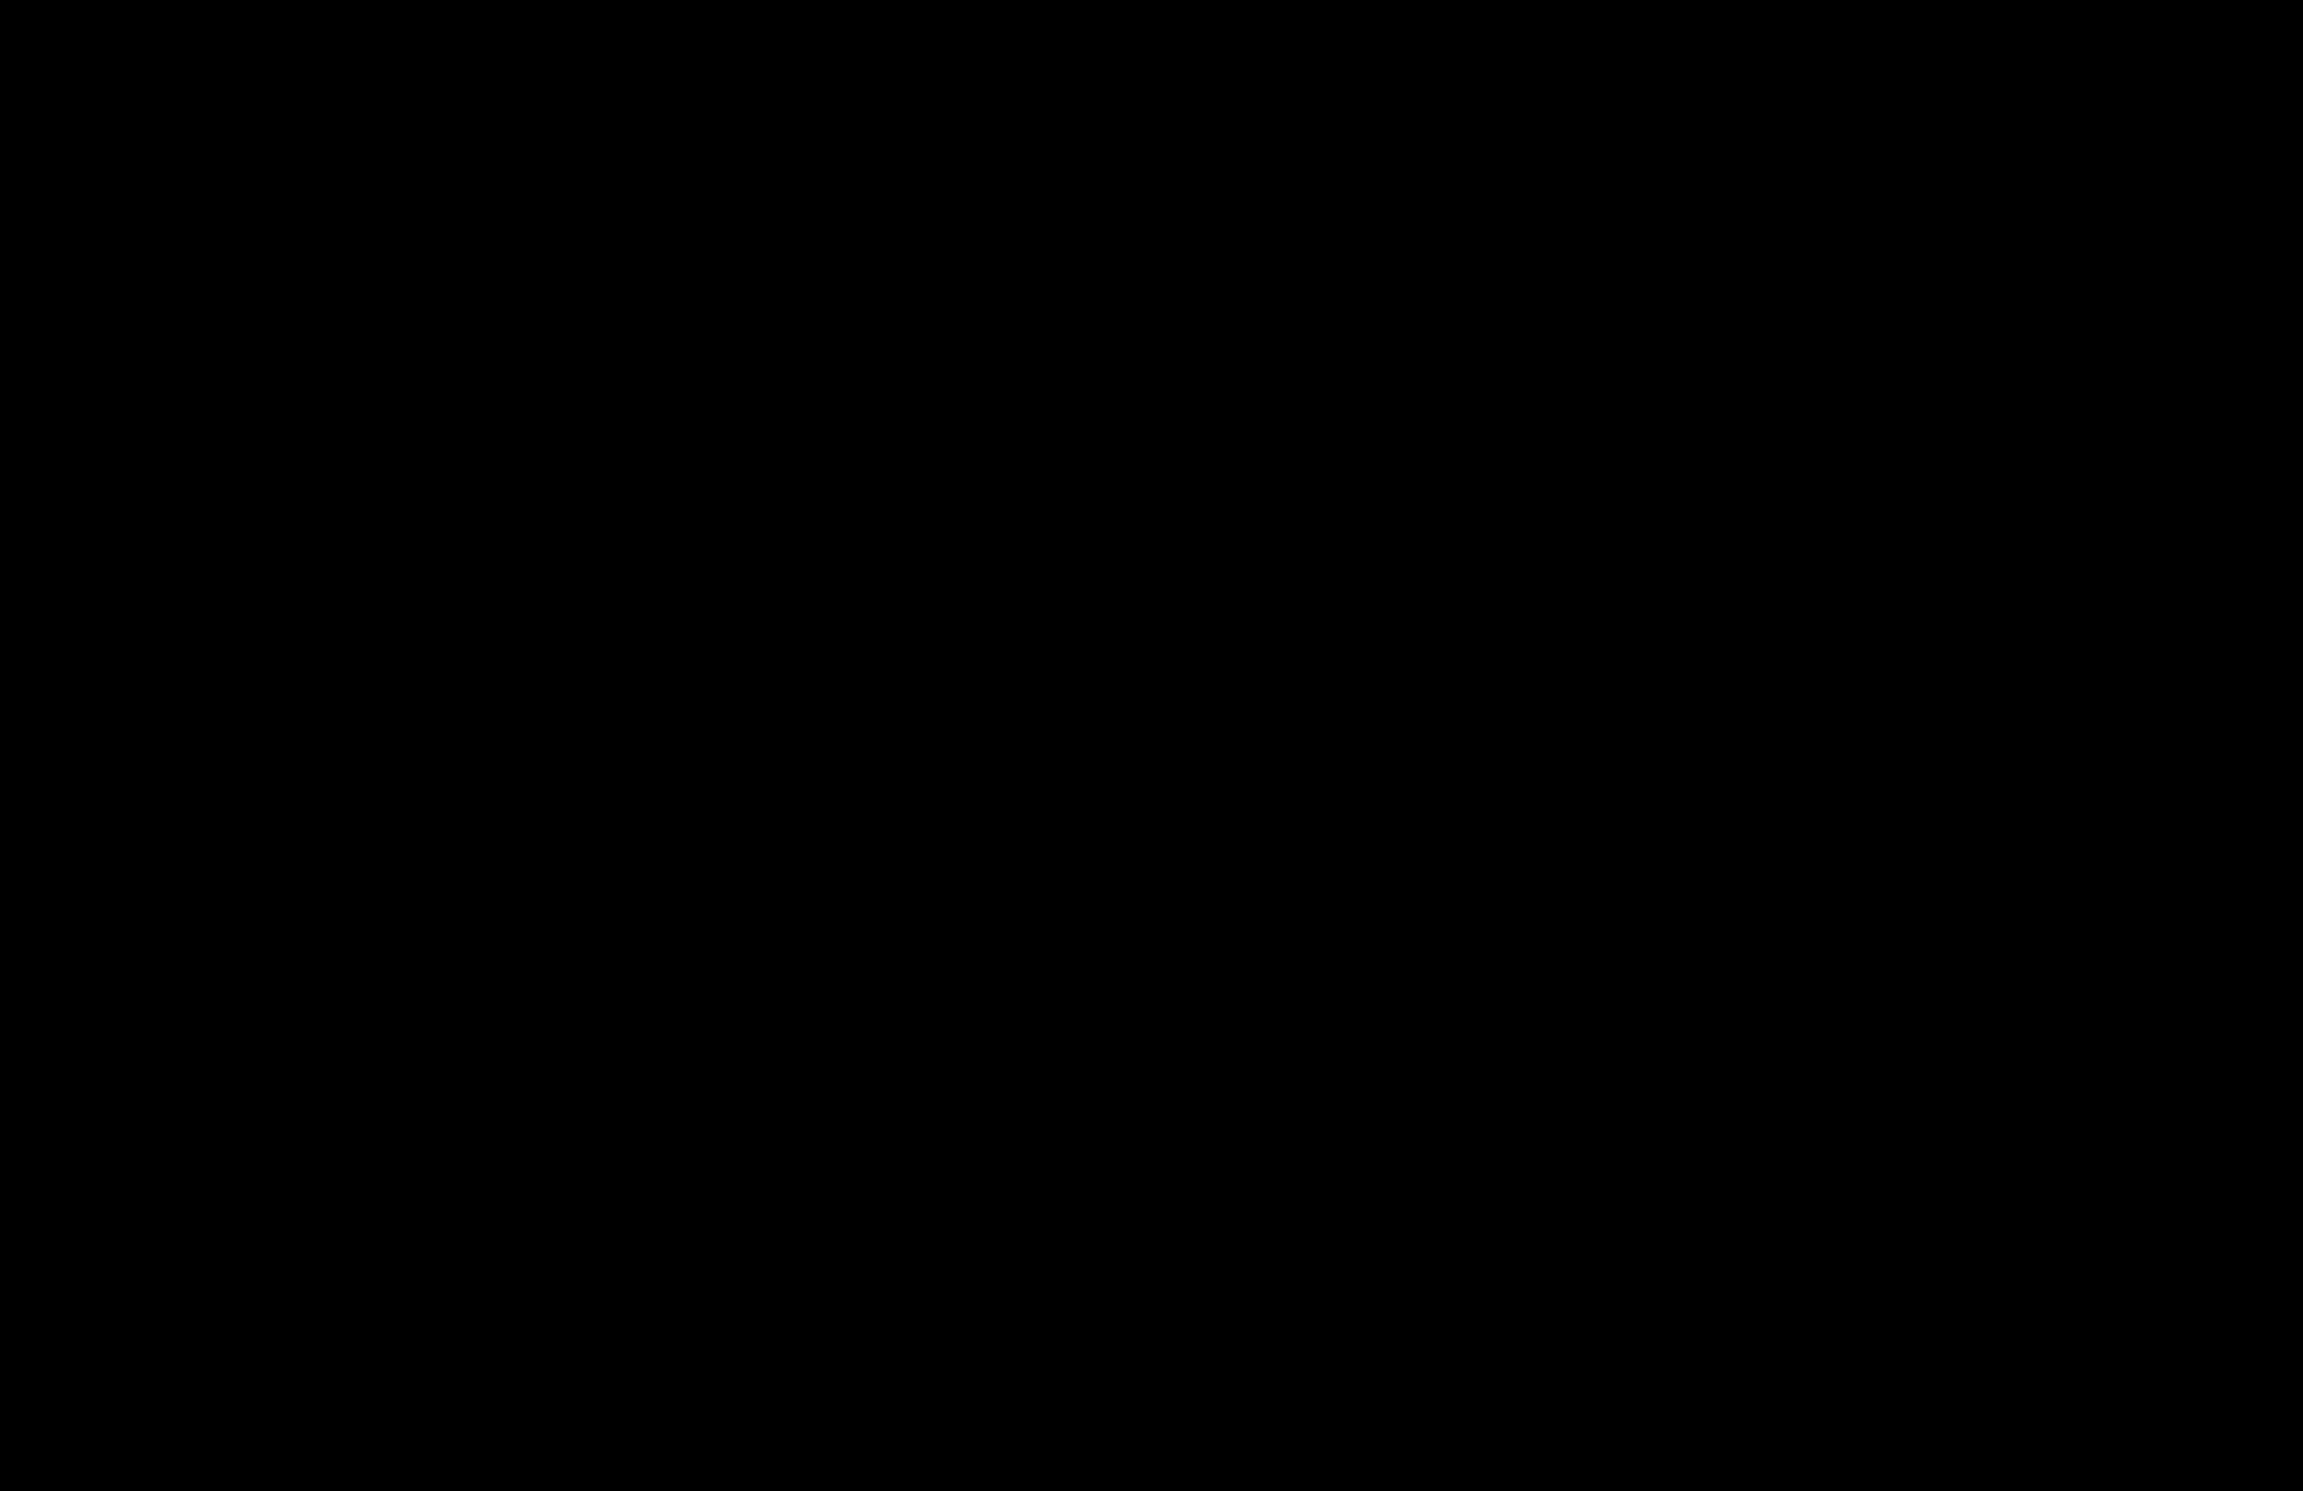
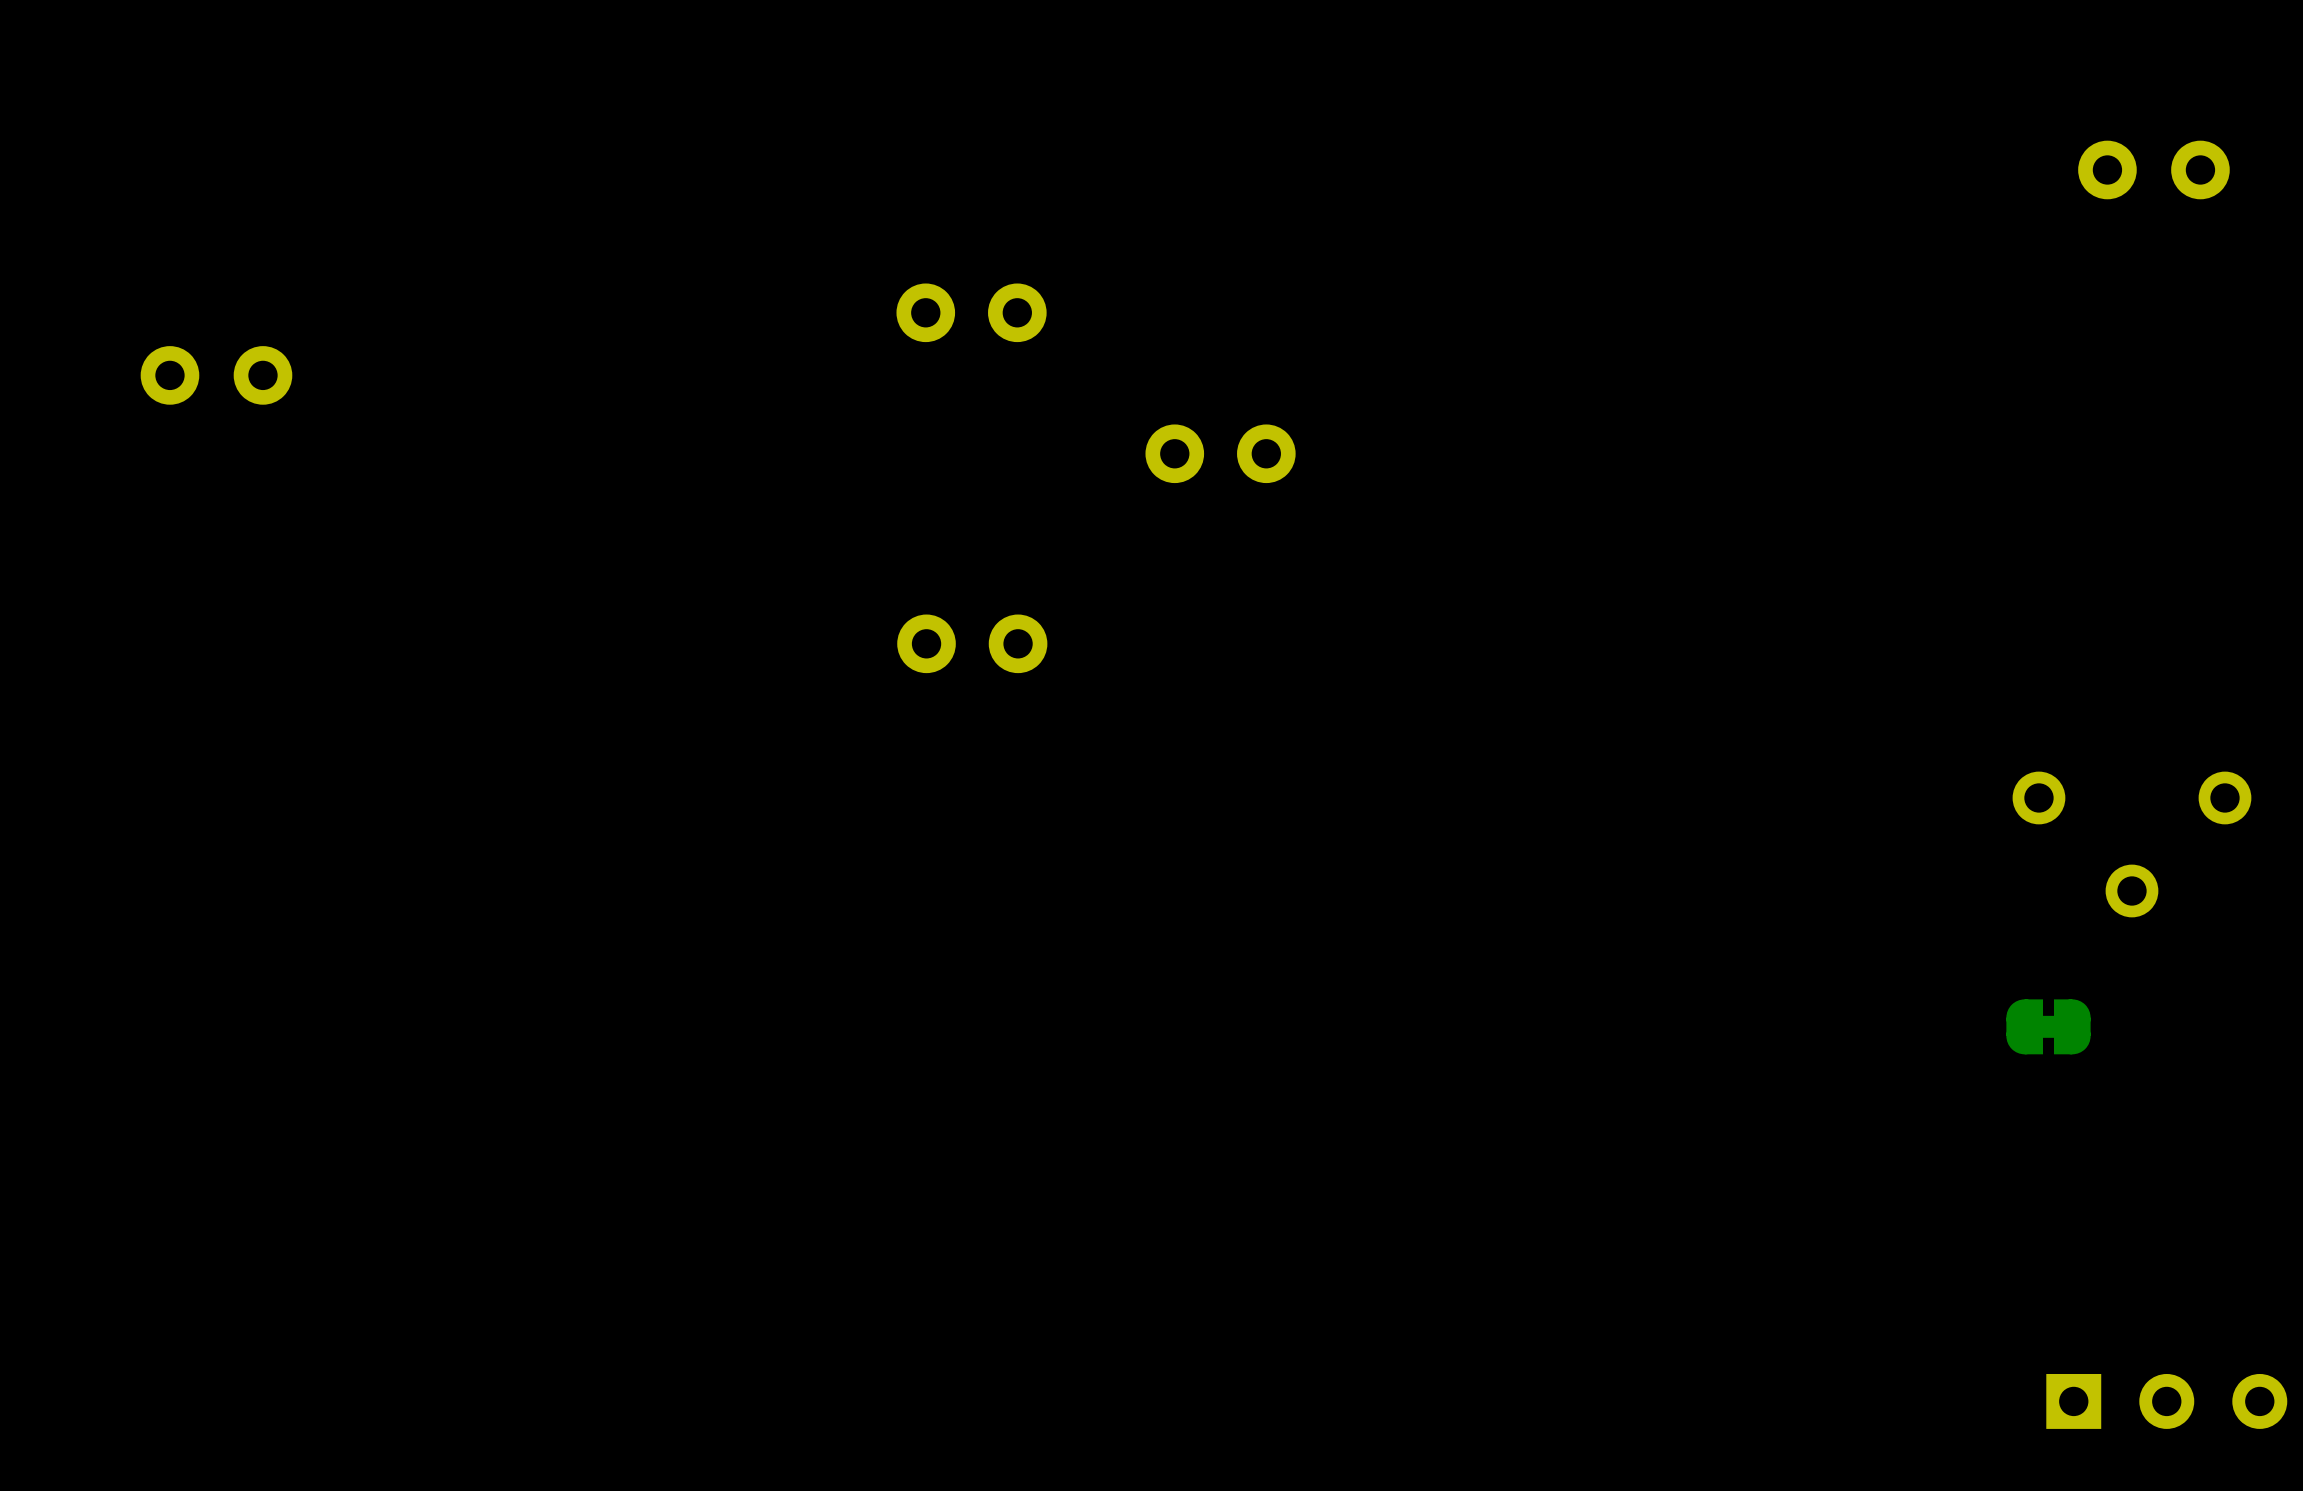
part: none -> (2153, 169)
part: none -> (971, 312)
part: none -> (216, 375)
part: none -> (1220, 453)
part: none -> (972, 643)
part: none -> (2131, 844)
part: none -> (2048, 1026)
part: none -> (2166, 1401)

